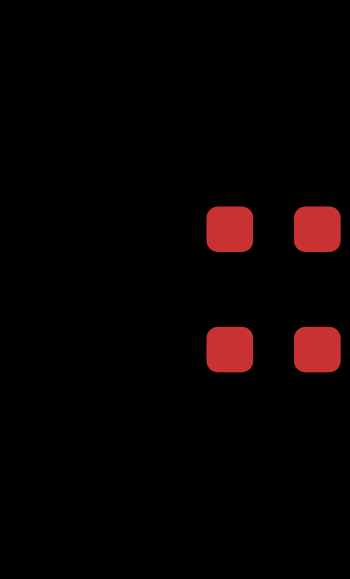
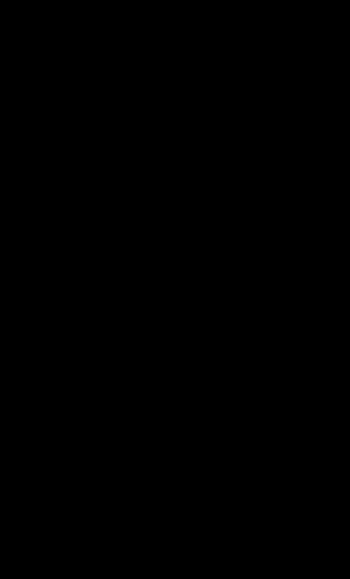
part: (273, 229) -> none
part: (273, 349) -> none

